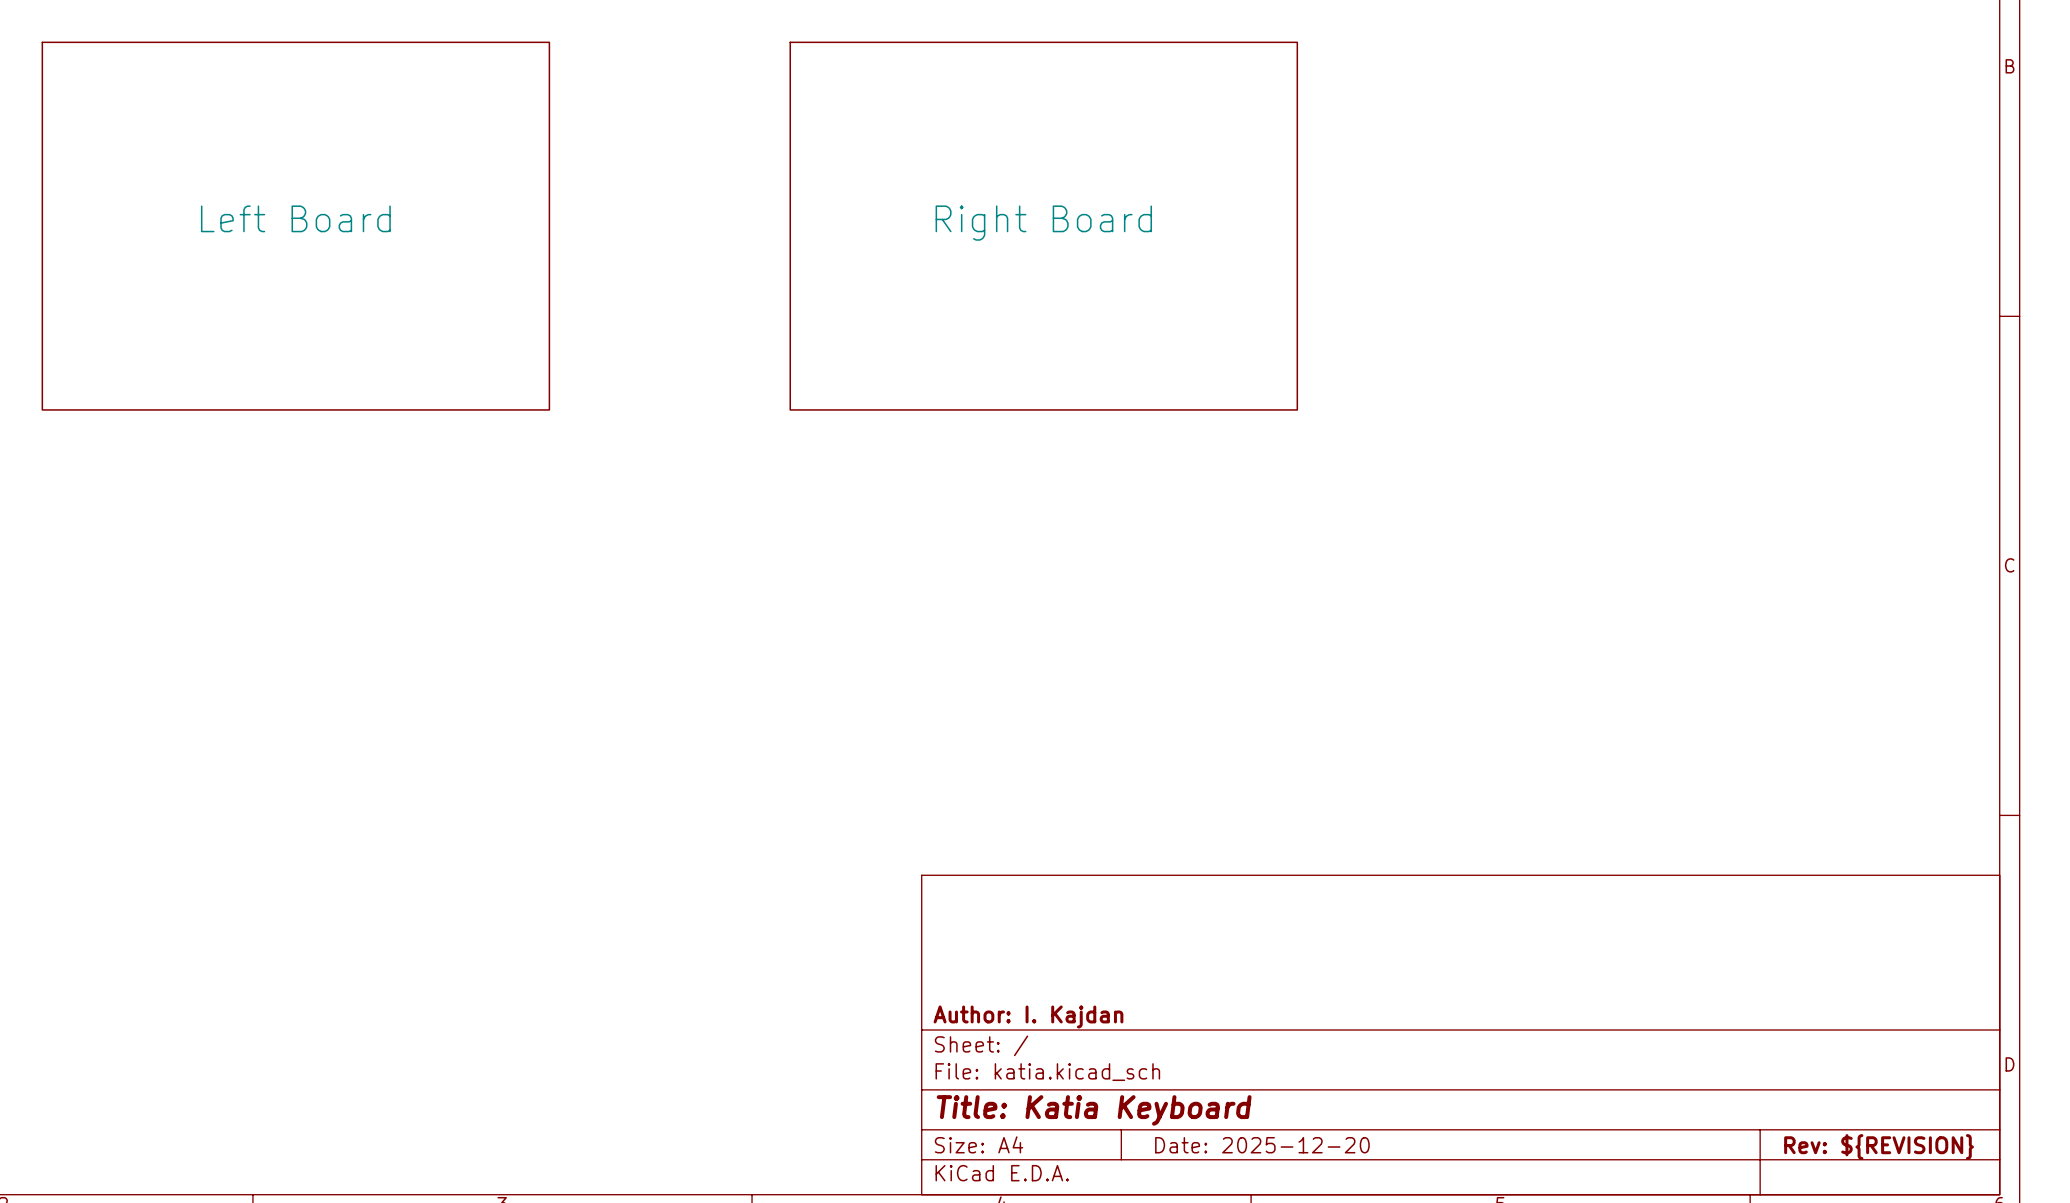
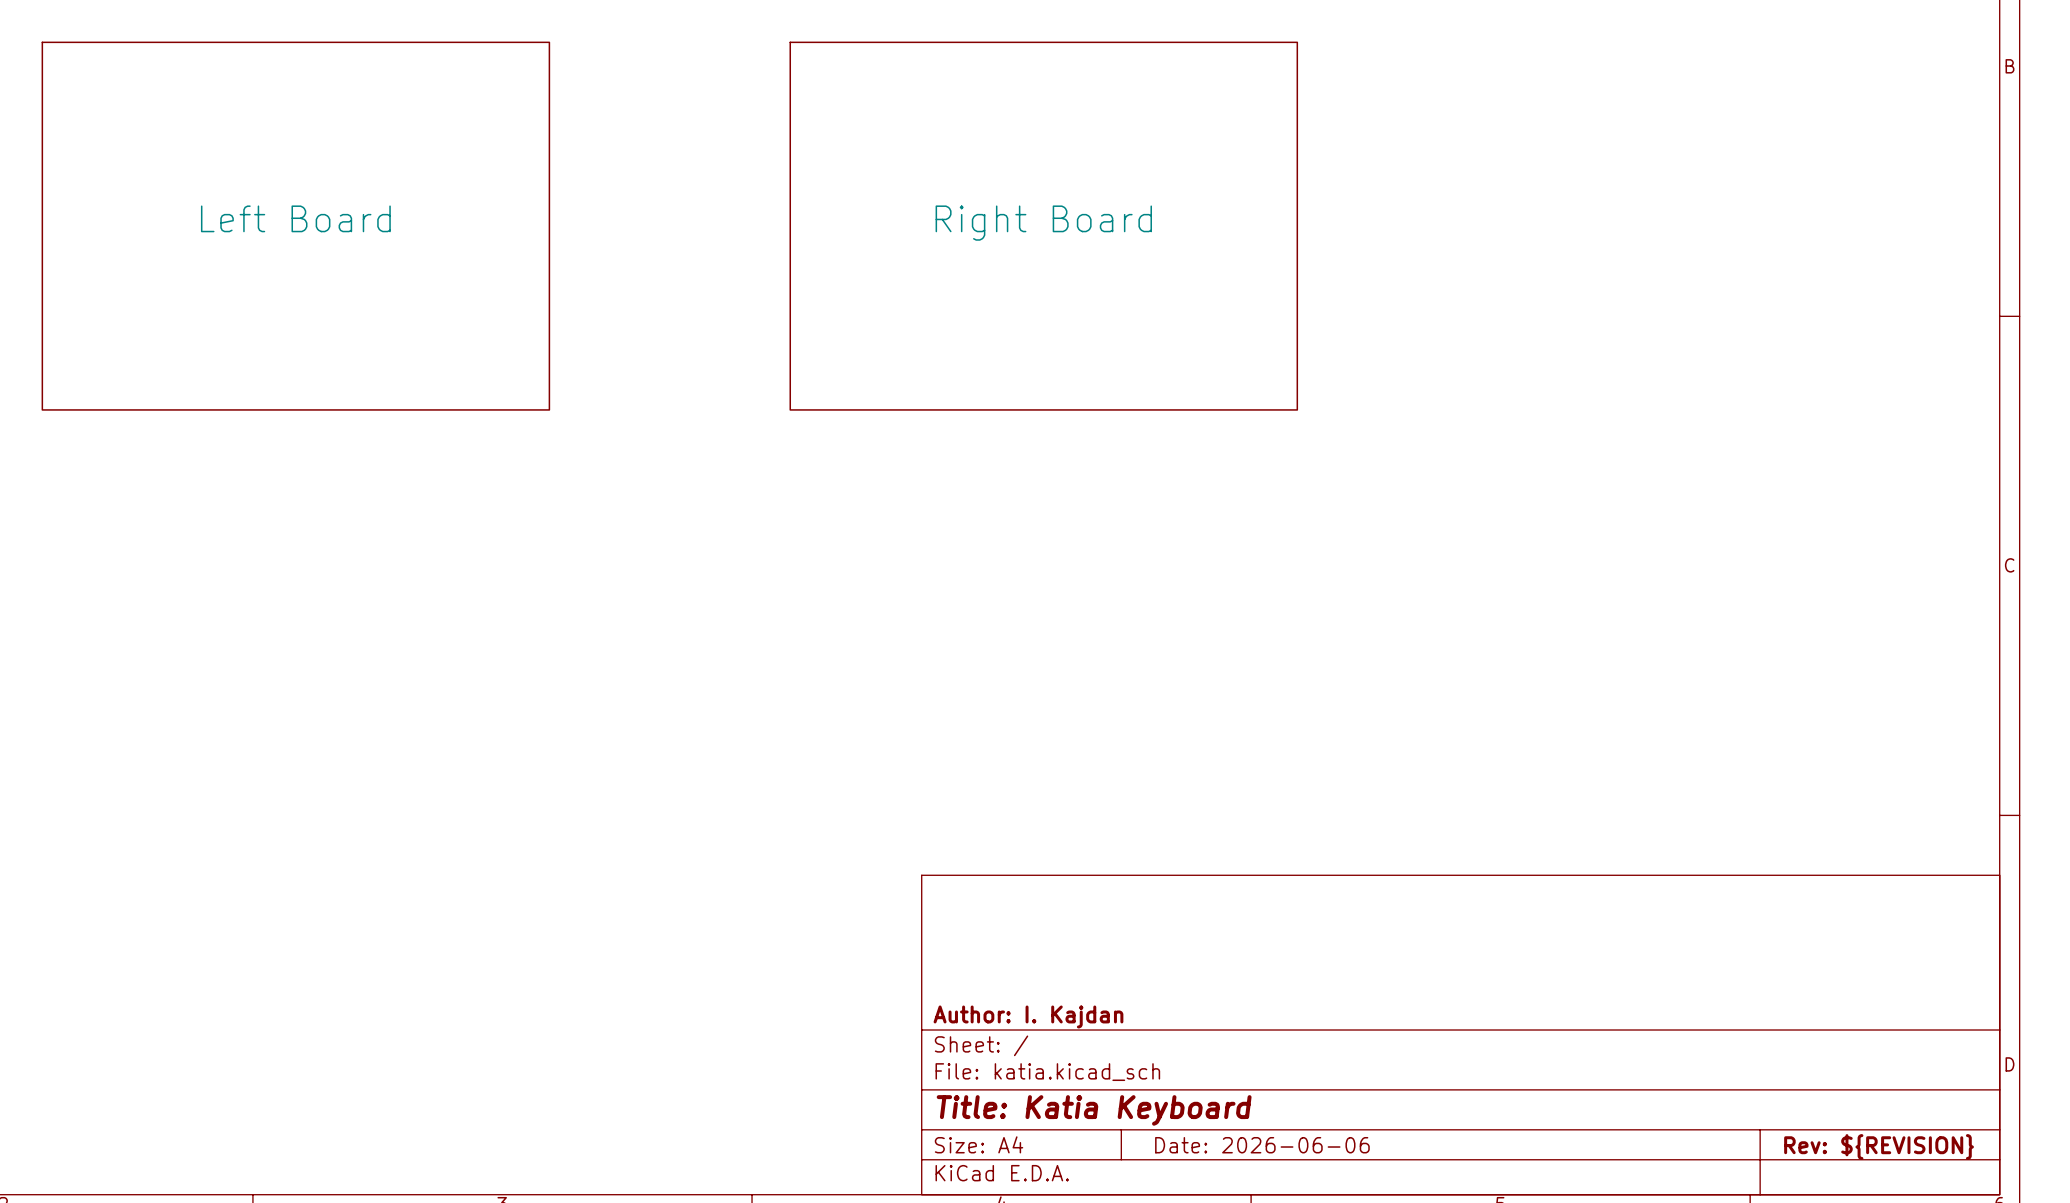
title block: Date: 2025-12-20 (1262, 1145) -> Date: 2026-06-06 (1262, 1145)

